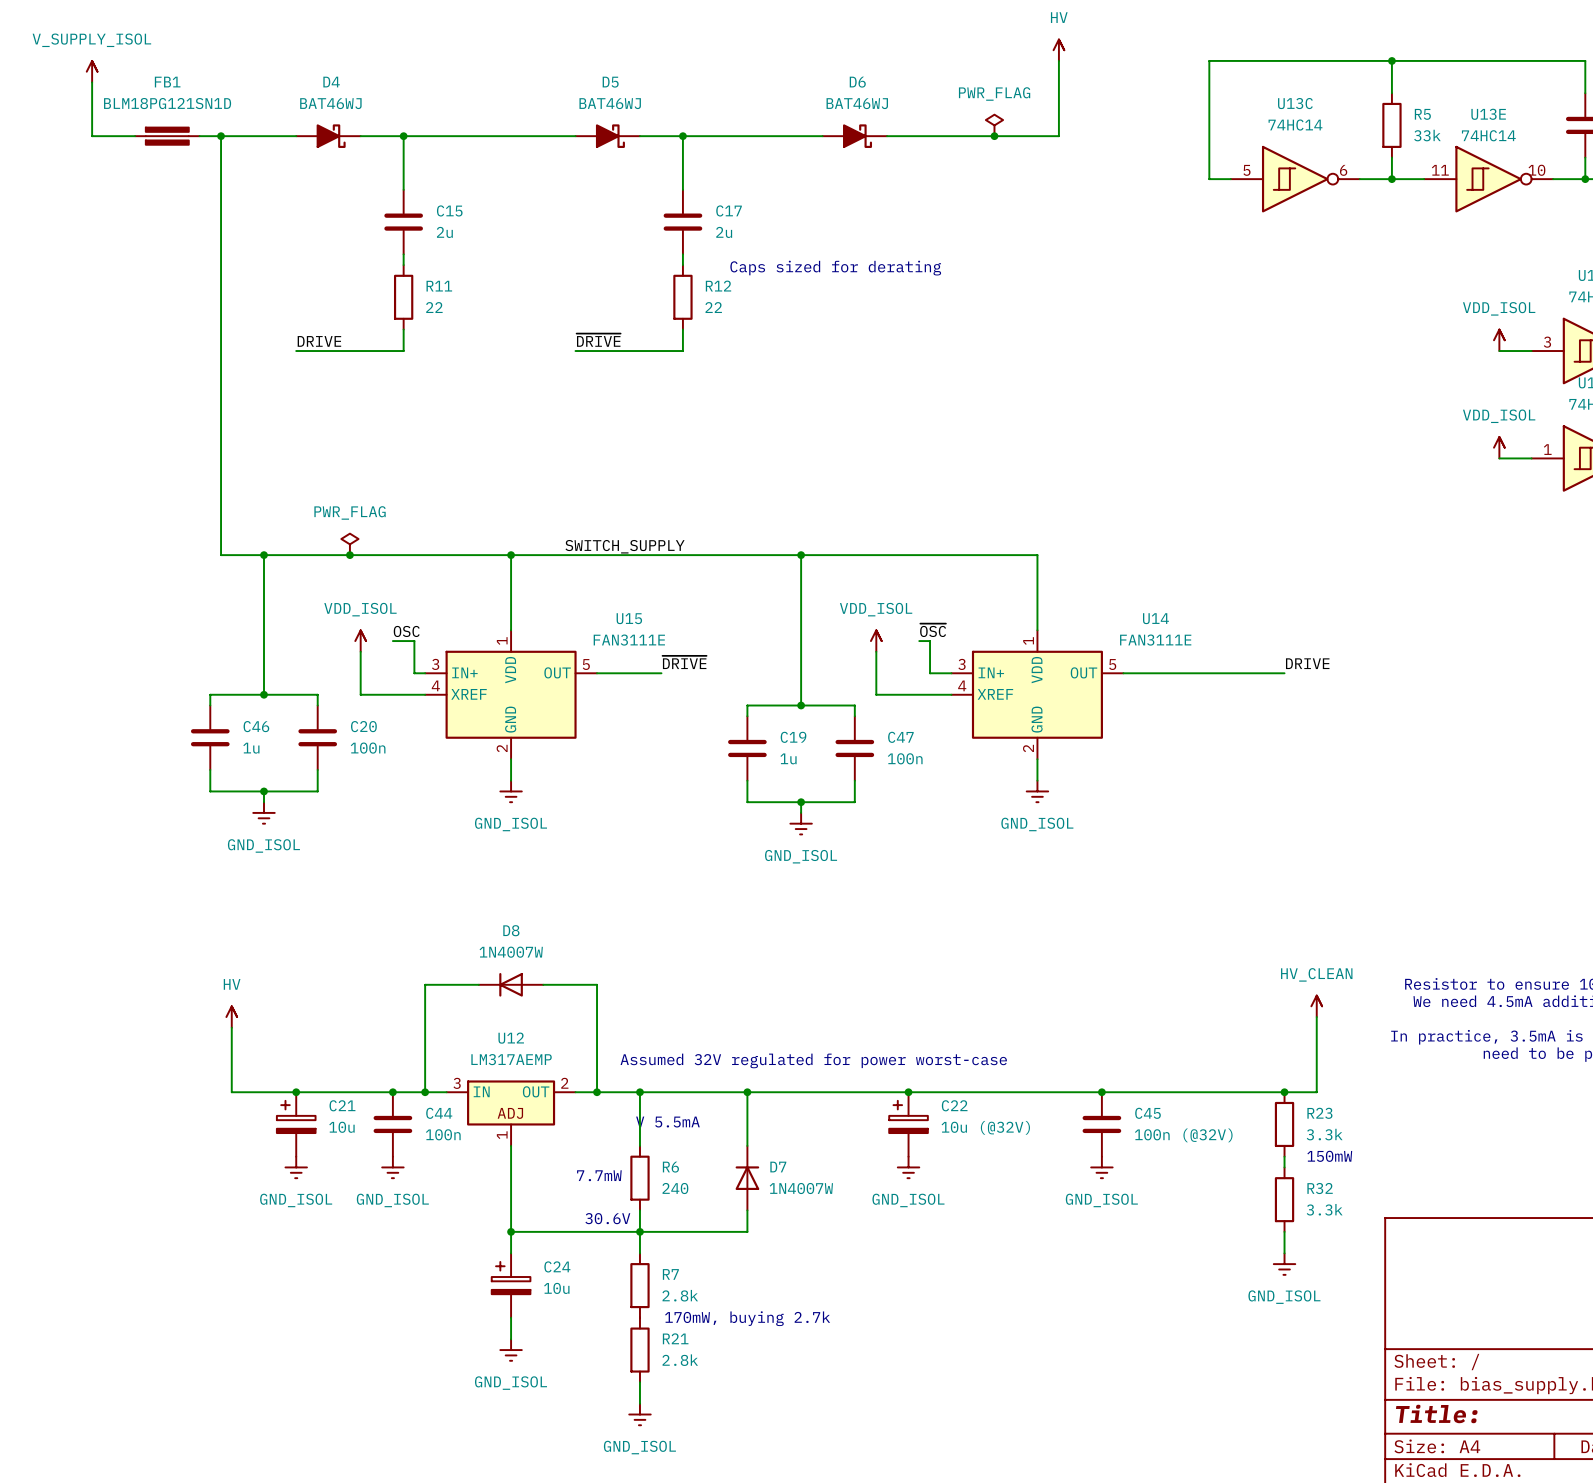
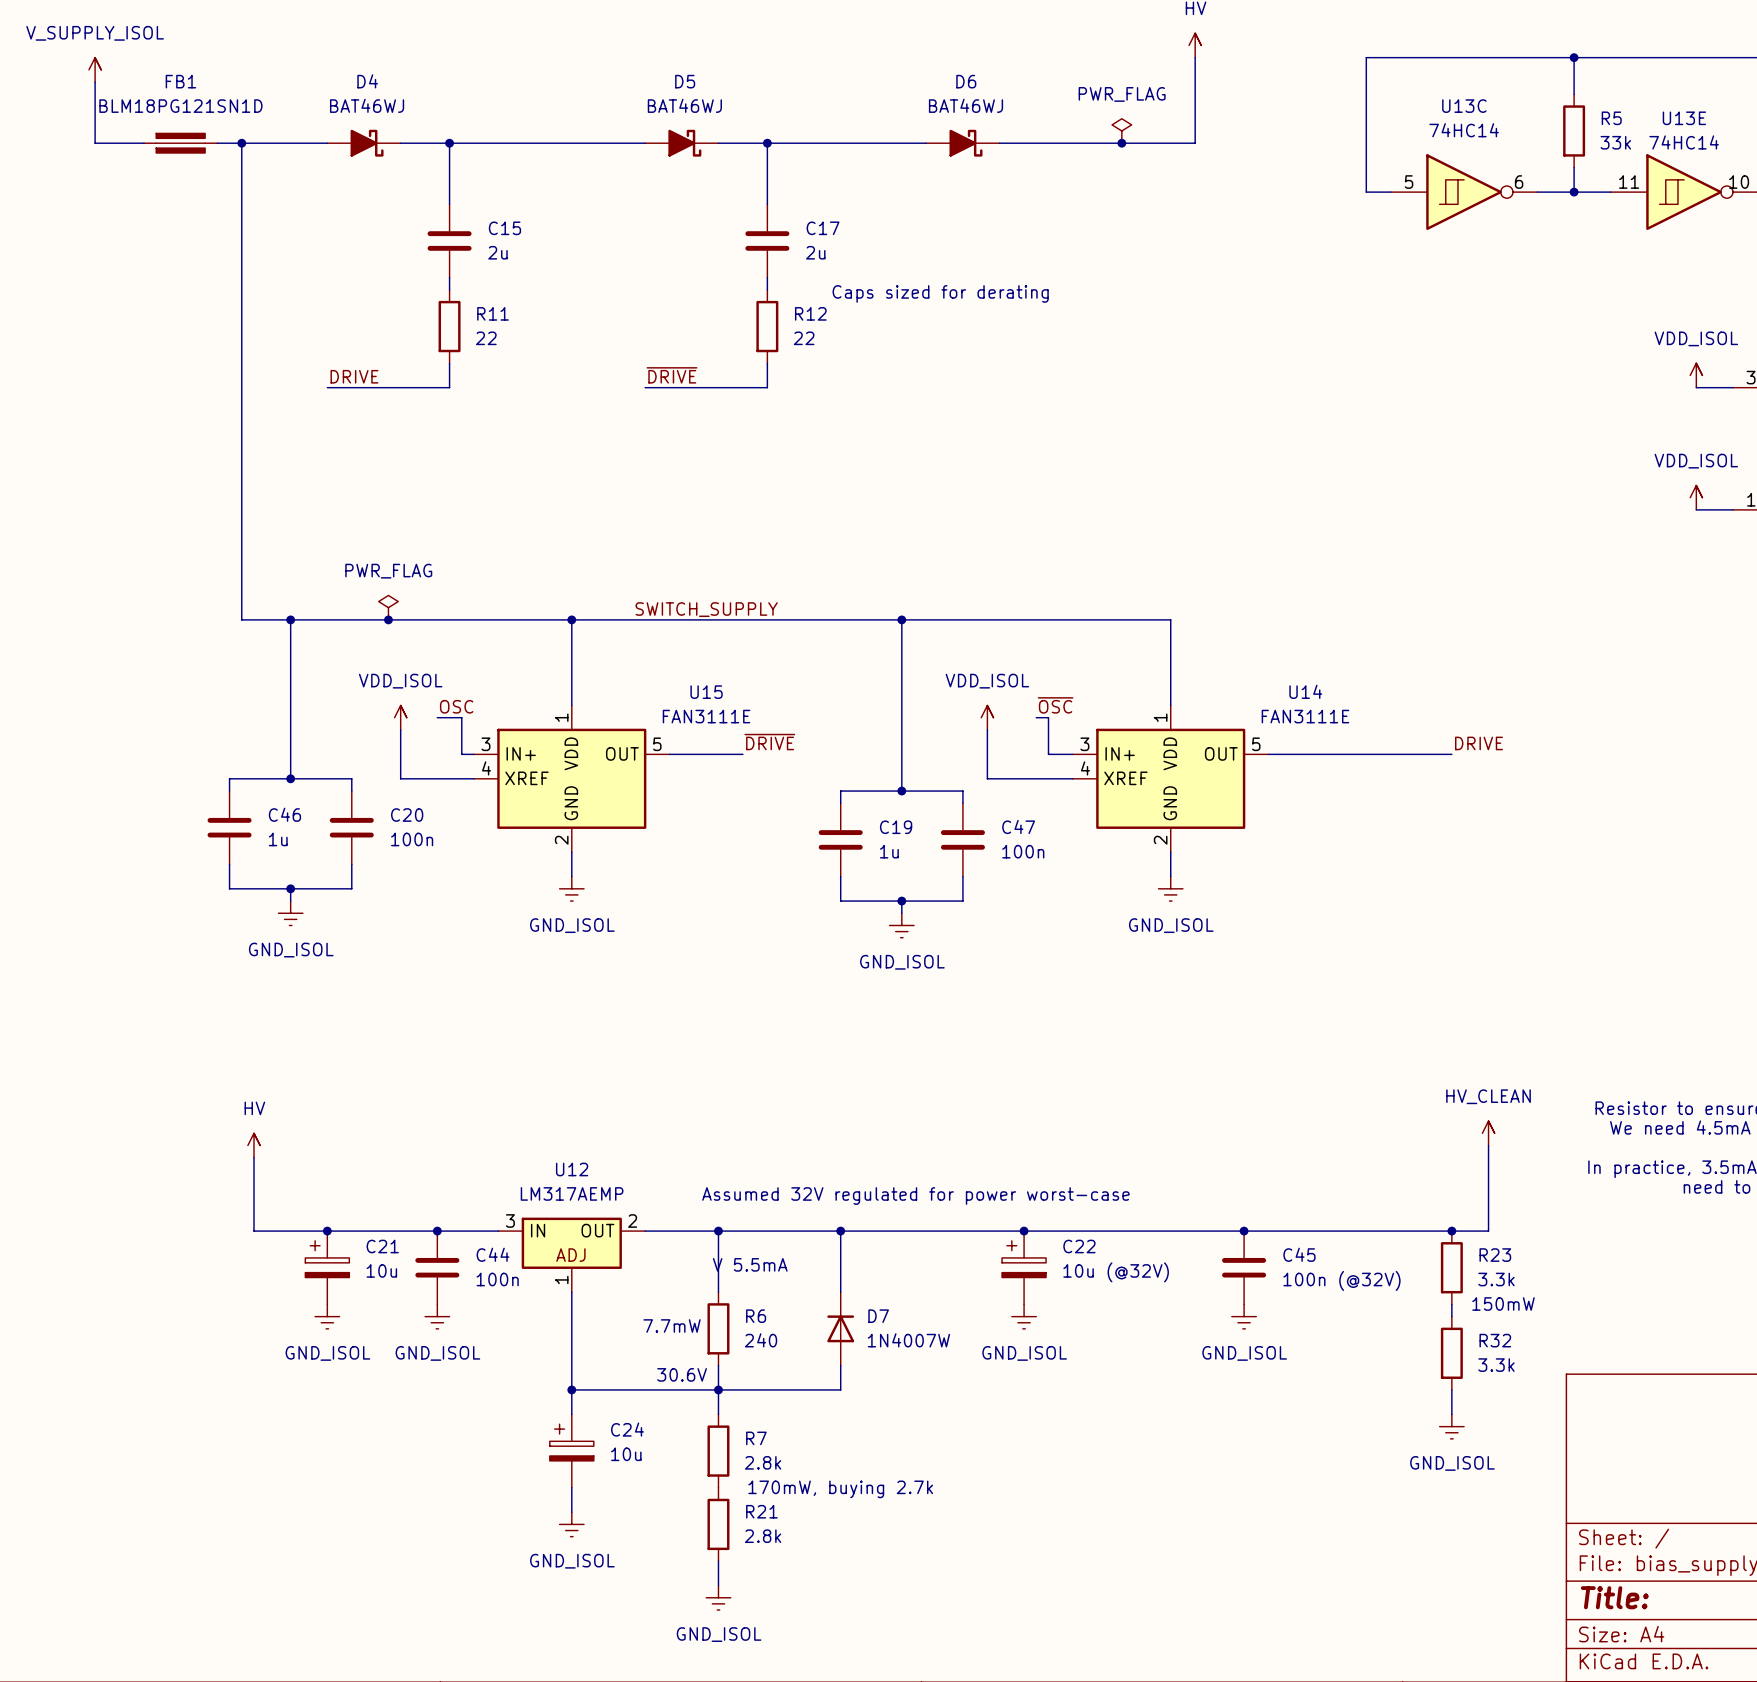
wire: (478, 984) (425, 984) (425, 1092) -> none
D8: 1N4007W (511, 984) -> none
wire: (543, 984) (597, 984) (597, 1092) -> none
junction: (425, 1092) -> none
junction: (597, 1092) -> none

